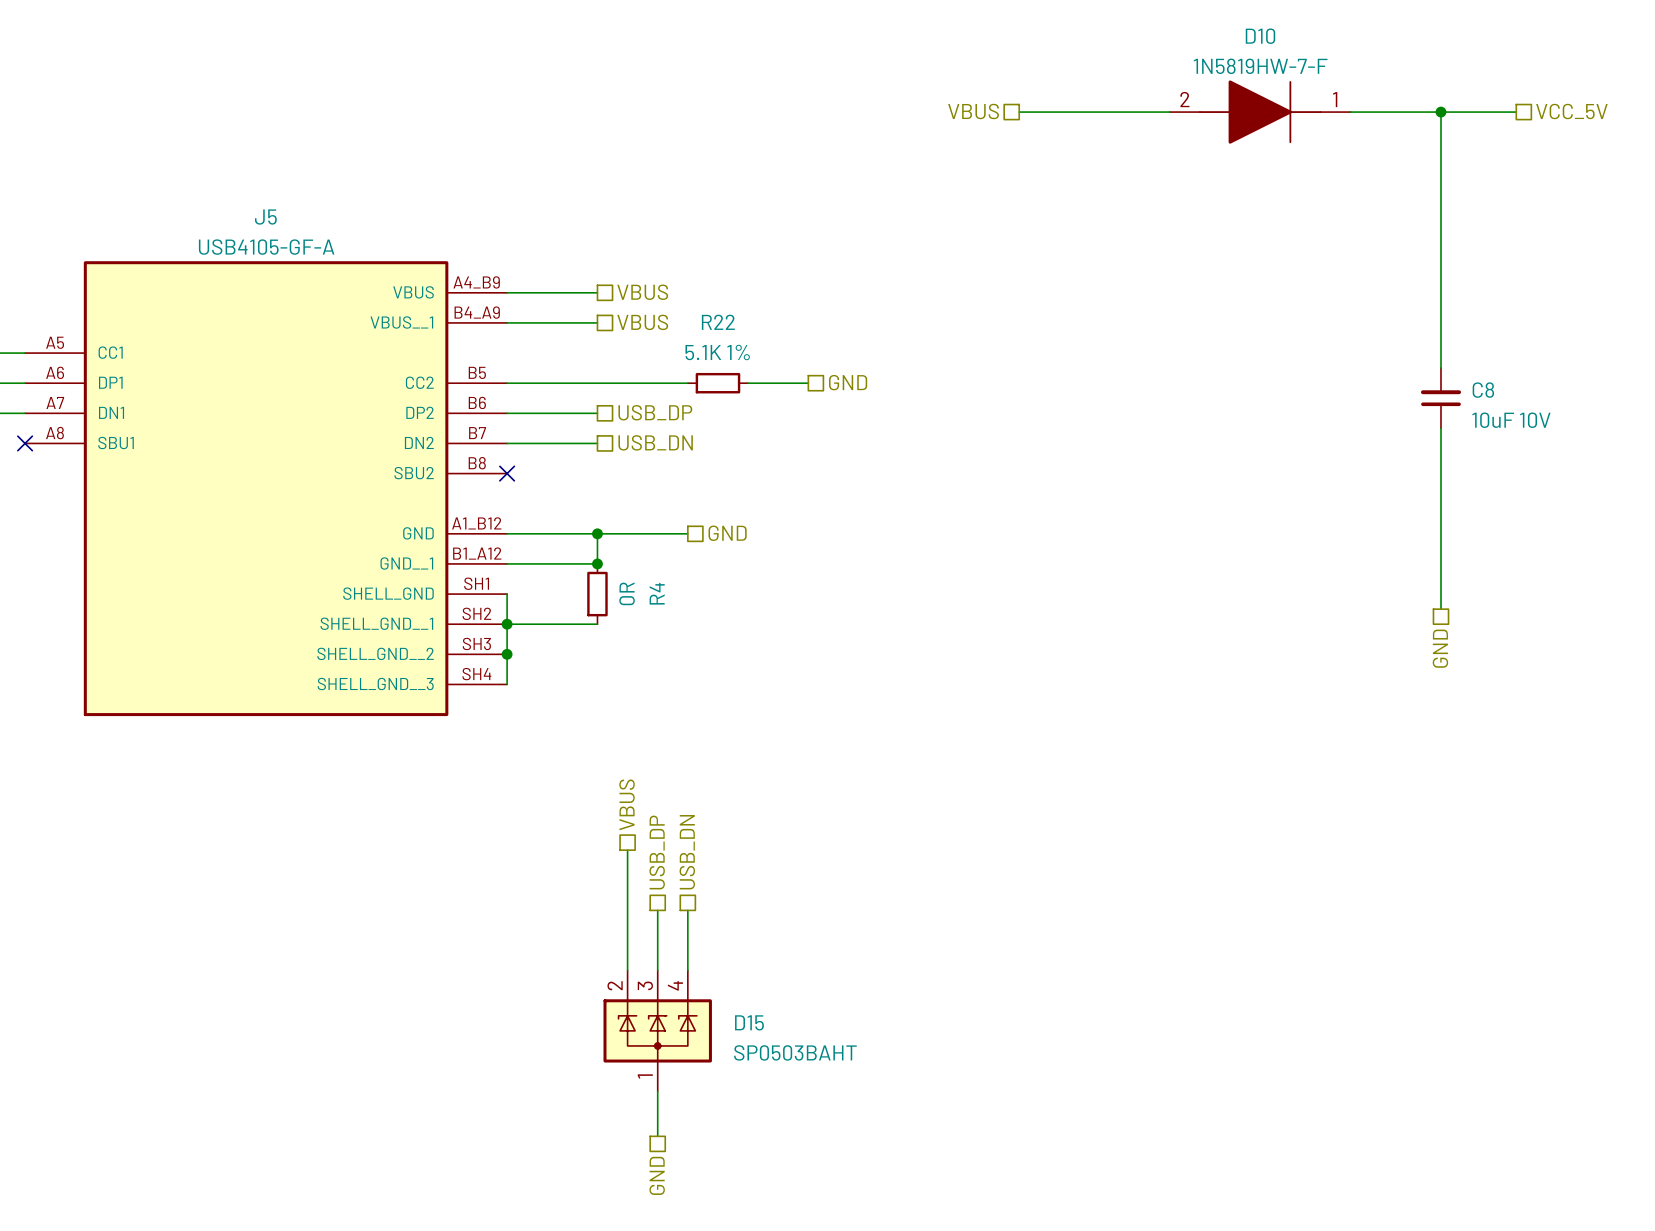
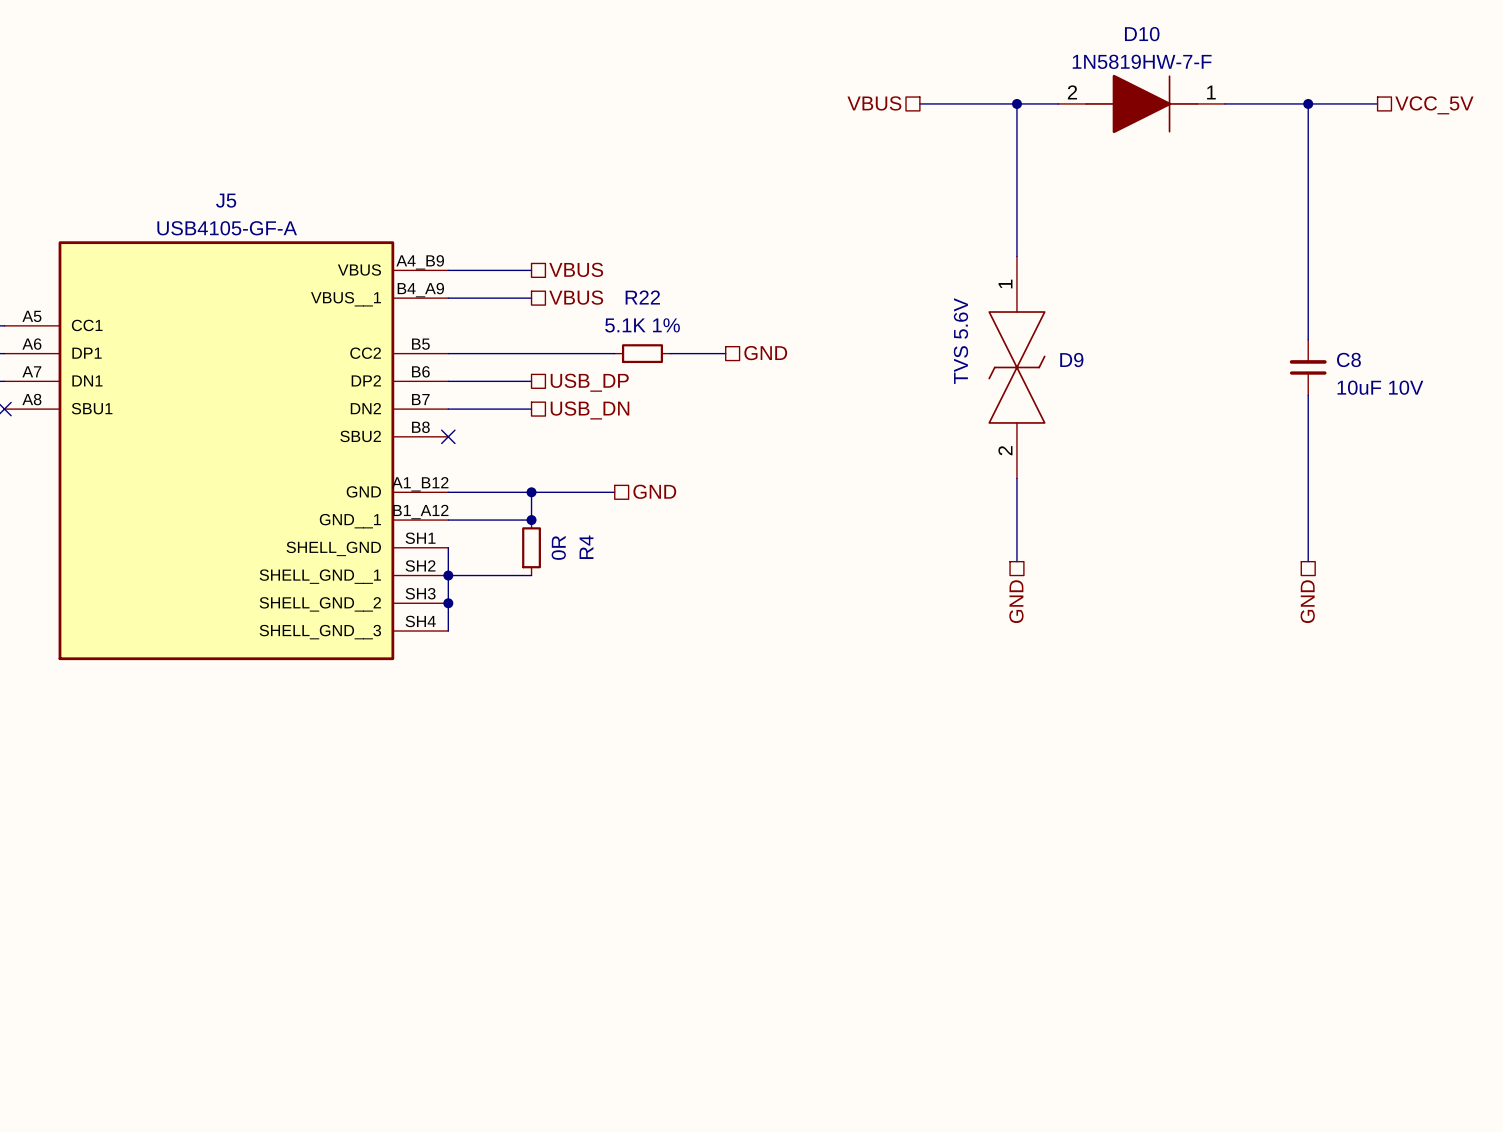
wire: none -> (1016, 103) (1016, 256)
junction: none -> (1016, 103)
D9: none -> TVS 5.6V (1016, 367)
wire: none -> (1016, 478) (1016, 561)
hierarchical label: none -> GND (1016, 601)
hierarchical label: VBUS (627, 804) -> none
wire: (627, 850) (627, 970) -> none
hierarchical label: USB_DP (657, 852) -> none
hierarchical label: USB_DN (687, 852) -> none
wire: (657, 910) (657, 970) -> none
wire: (687, 910) (687, 970) -> none
D15: SP0503BAHT (657, 1030) -> none
wire: (657, 1091) (657, 1136) -> none
hierarchical label: GND (657, 1175) -> none

